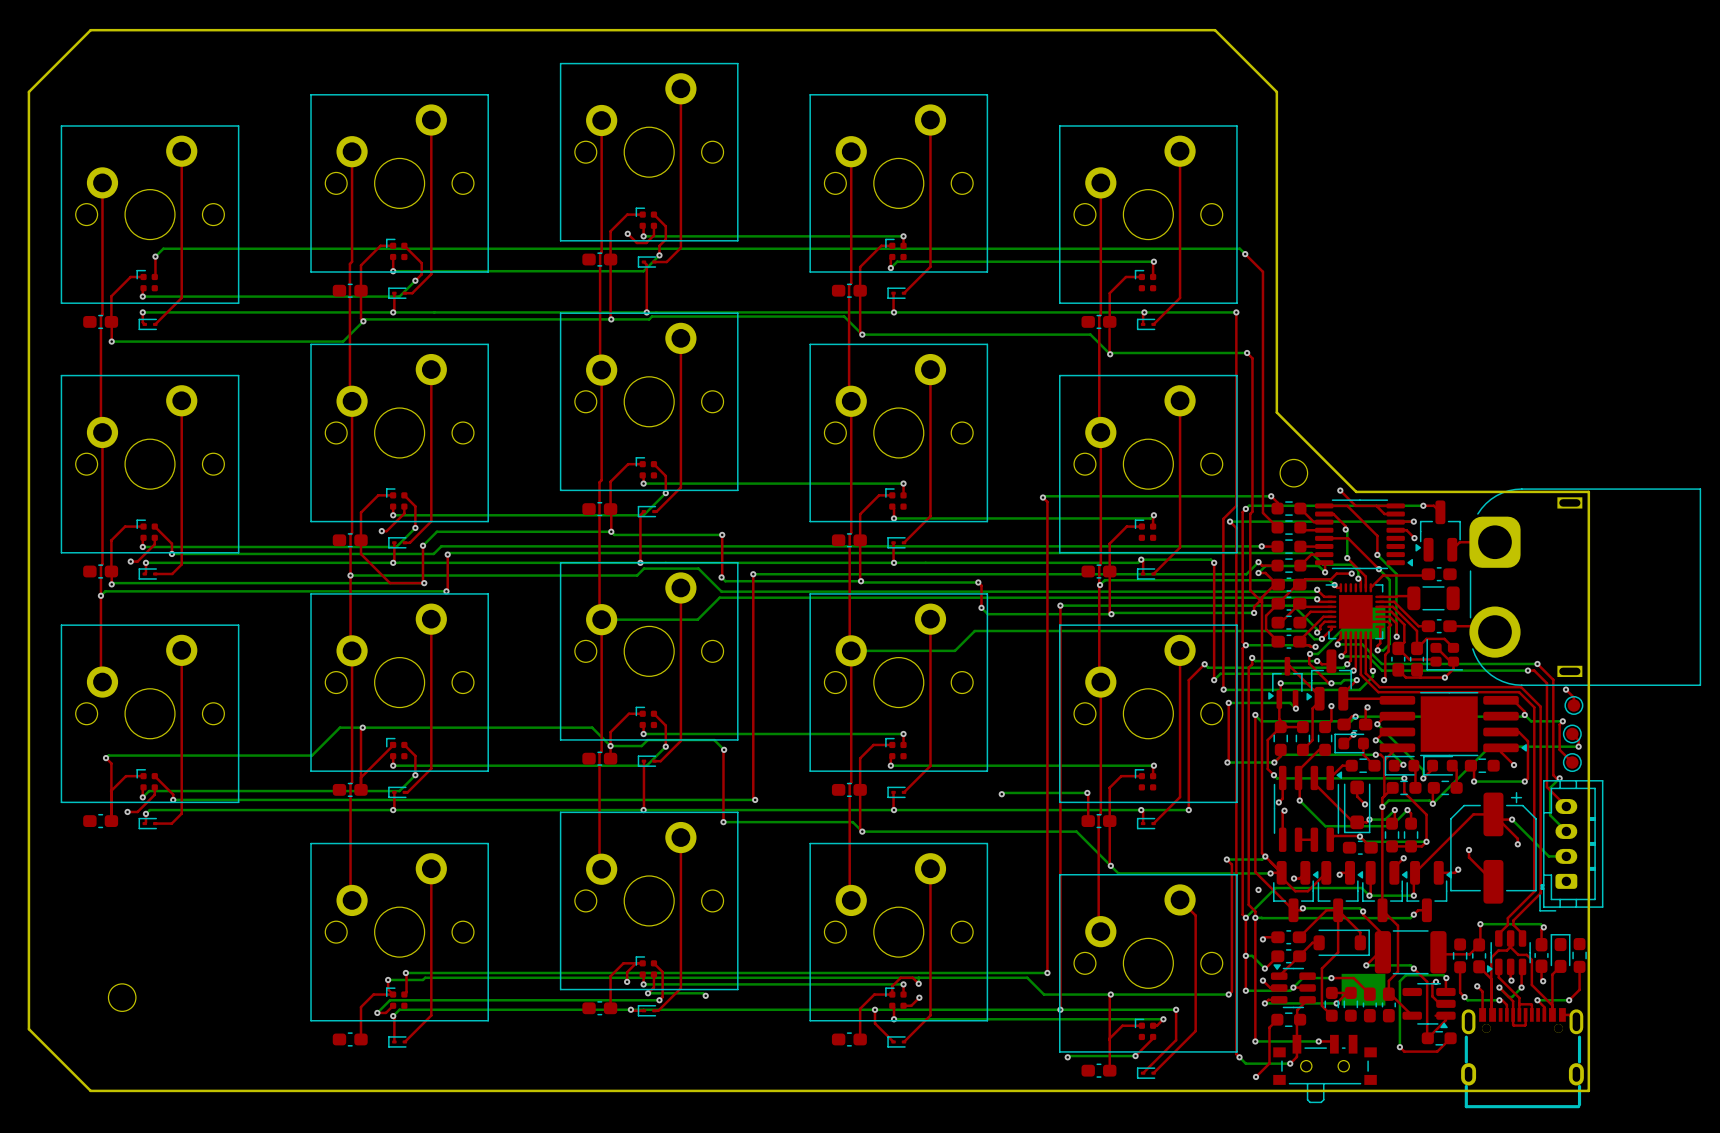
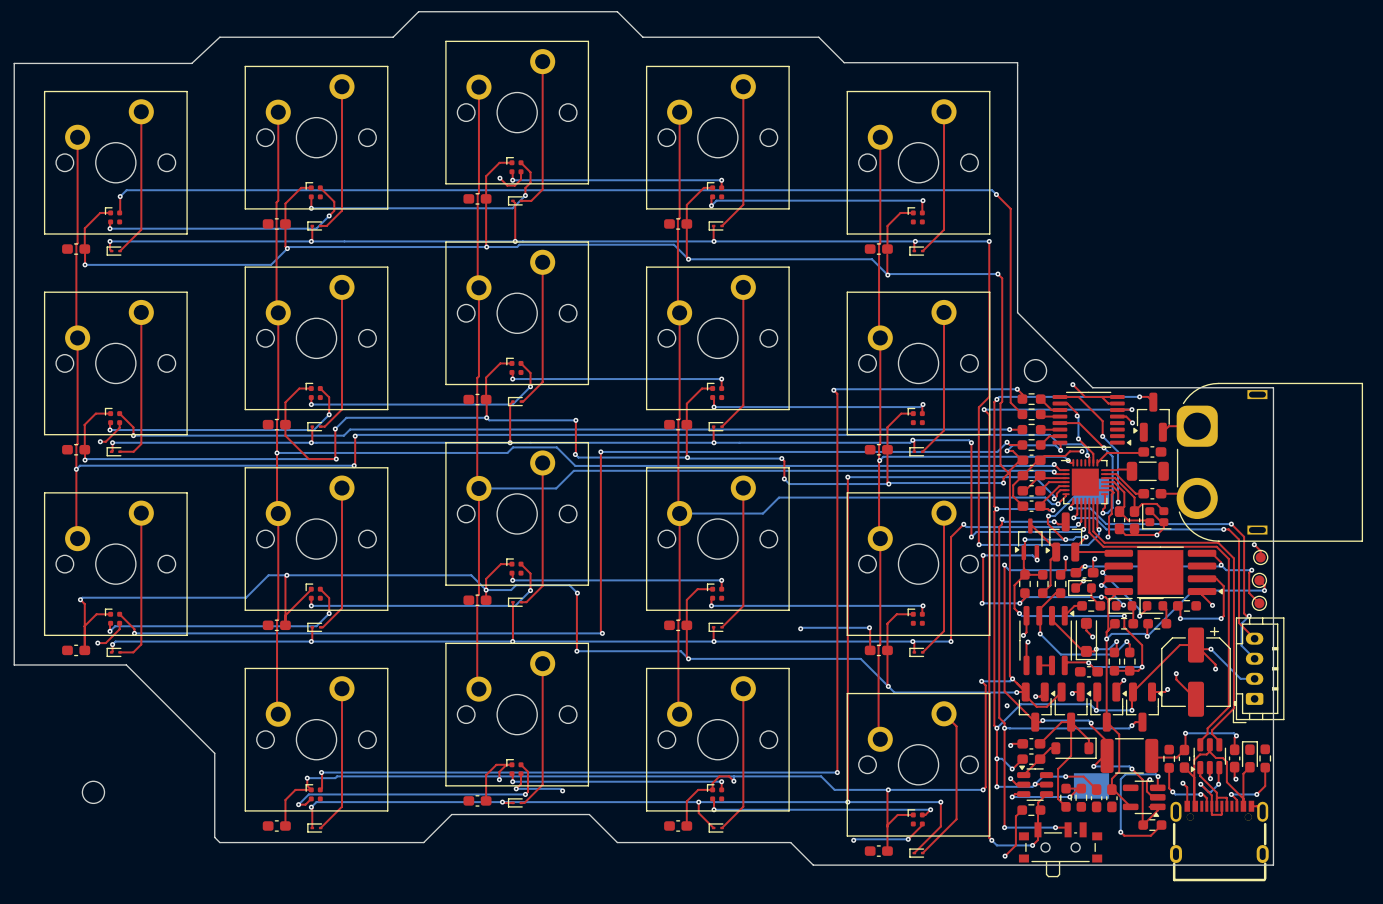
board edge: (90, 30) (1215, 30) (1276, 91) (1276, 412) (1356, 491) (1588, 491) (1588, 1090) (90, 1090) (28, 1029) (28, 91) (90, 30) -> (418, 11) (393, 37) (219, 37) (191, 63) (14, 63) (14, 664) (126, 664) (214, 753) (214, 837) (219, 842) (423, 842) (451, 814) (589, 814) (617, 842) (790, 842) (813, 865) (1273, 865) (1273, 387) (1092, 387) (1017, 312) (1017, 62) (844, 62) (818, 37) (642, 37) (617, 11) (418, 11)
top track: (404, 506) (404, 513) (386, 531) (381, 531) -> none
via: (381, 531) -> none
top track: (919, 997) (911, 1005) (903, 1005) -> none
via: (919, 997) -> none

